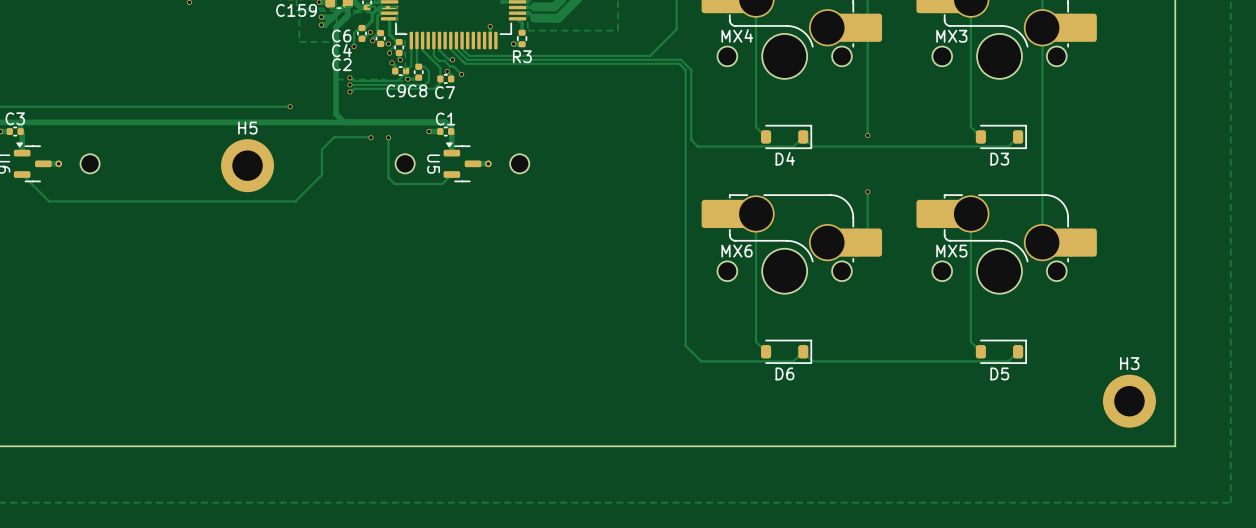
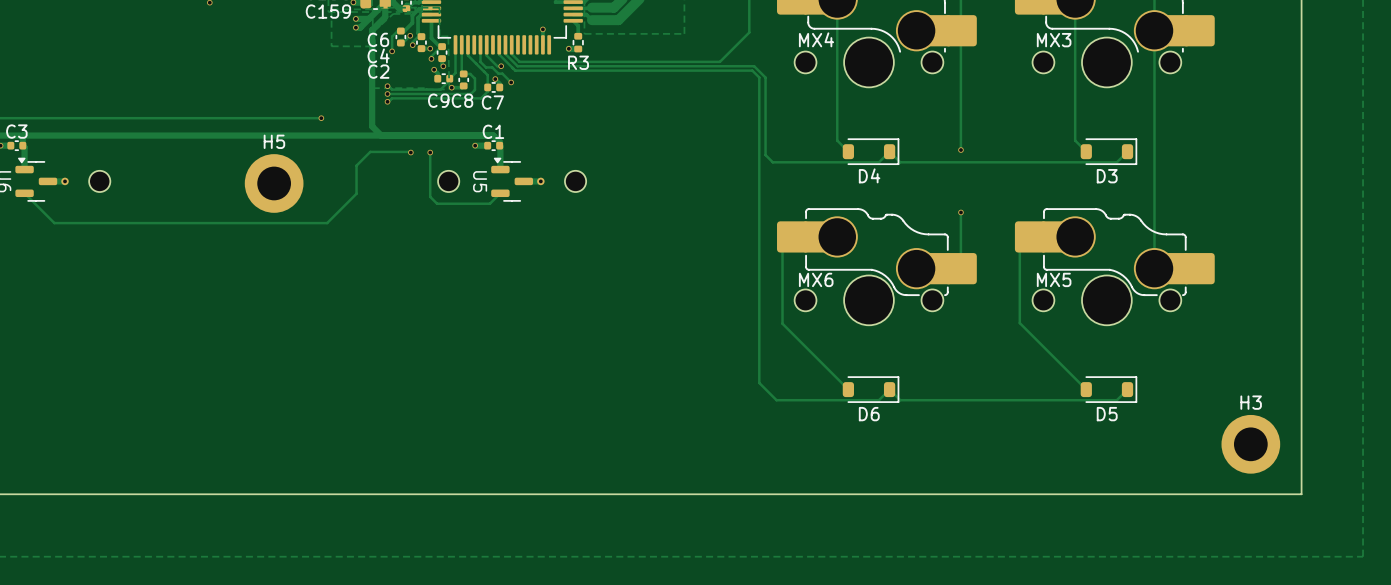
MX6 footprint: [701, 194, 883, 294] -> [777, 208, 977, 326]
MX5 footprint: [916, 194, 1097, 294] -> [1014, 208, 1215, 326]
track: (756, 213) (756, 341) -> (792, 236) (782, 247) (782, 323) (837, 378)
track: (970, 213) (970, 341) -> (1030, 236) (1019, 247) (1019, 323) (1075, 378)

